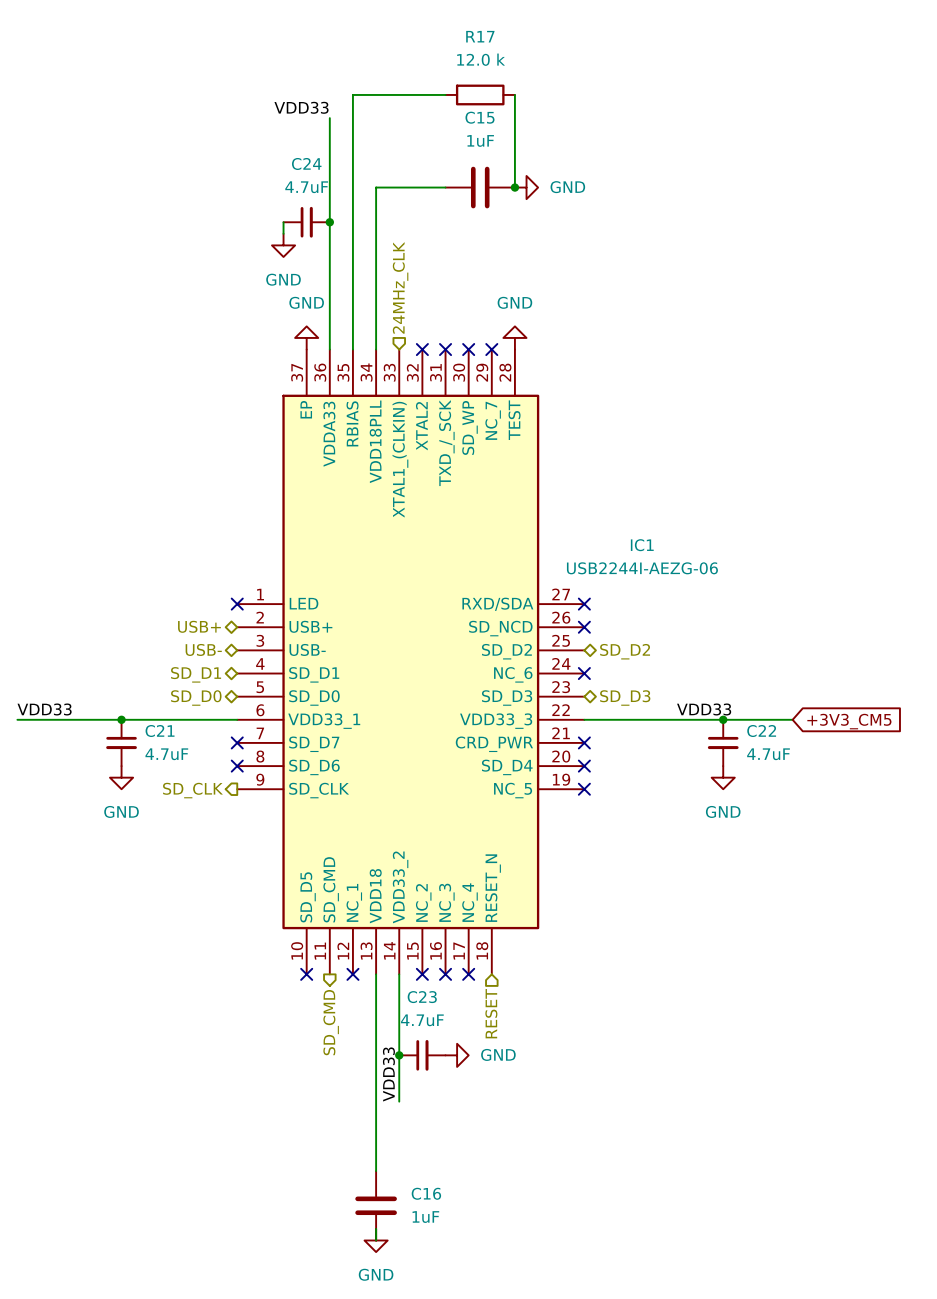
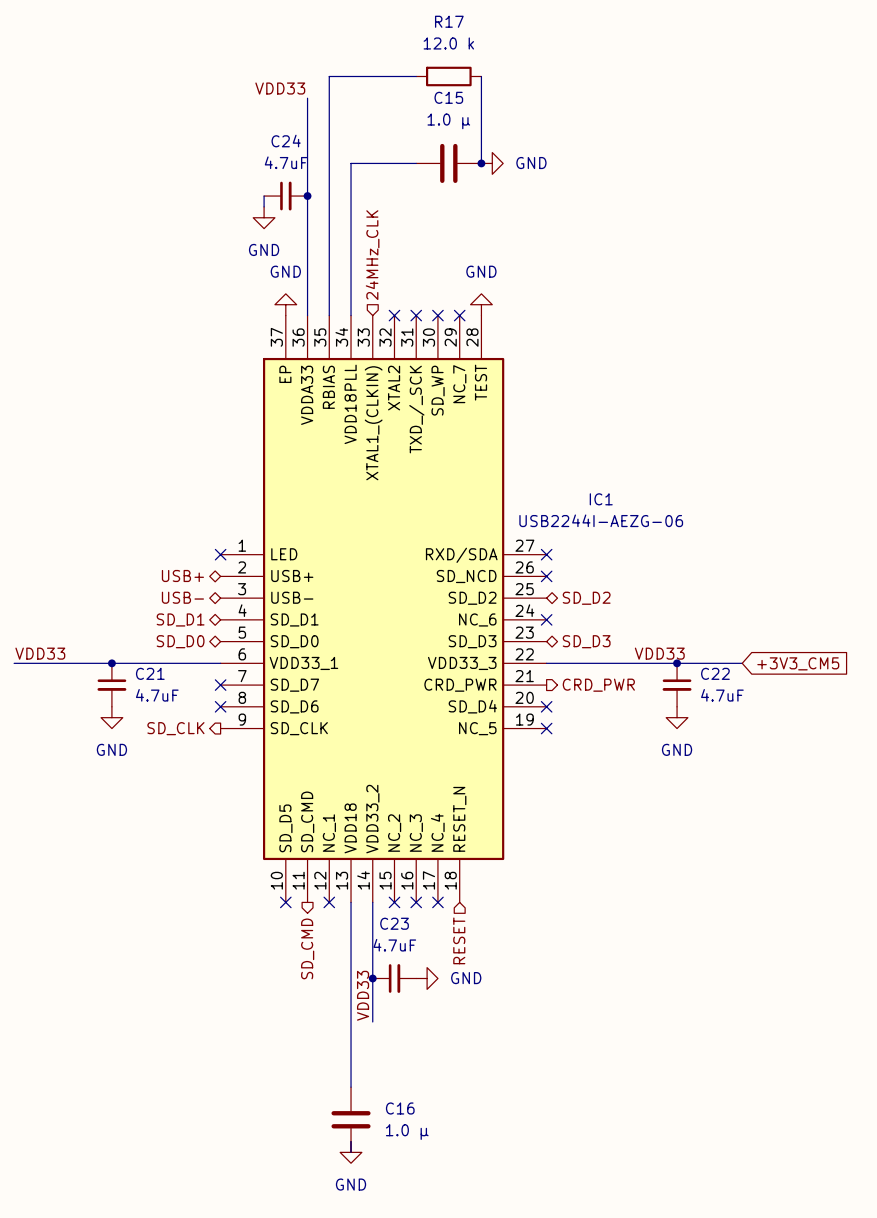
C15 value: 1uF (480, 140) -> 1.0 µ (448, 121)
no-connect mark: (584, 742) -> none
hierarchical label: none -> CRD_PWR (598, 685)
C16 value: 1uF (425, 1217) -> 1.0 µ (407, 1132)

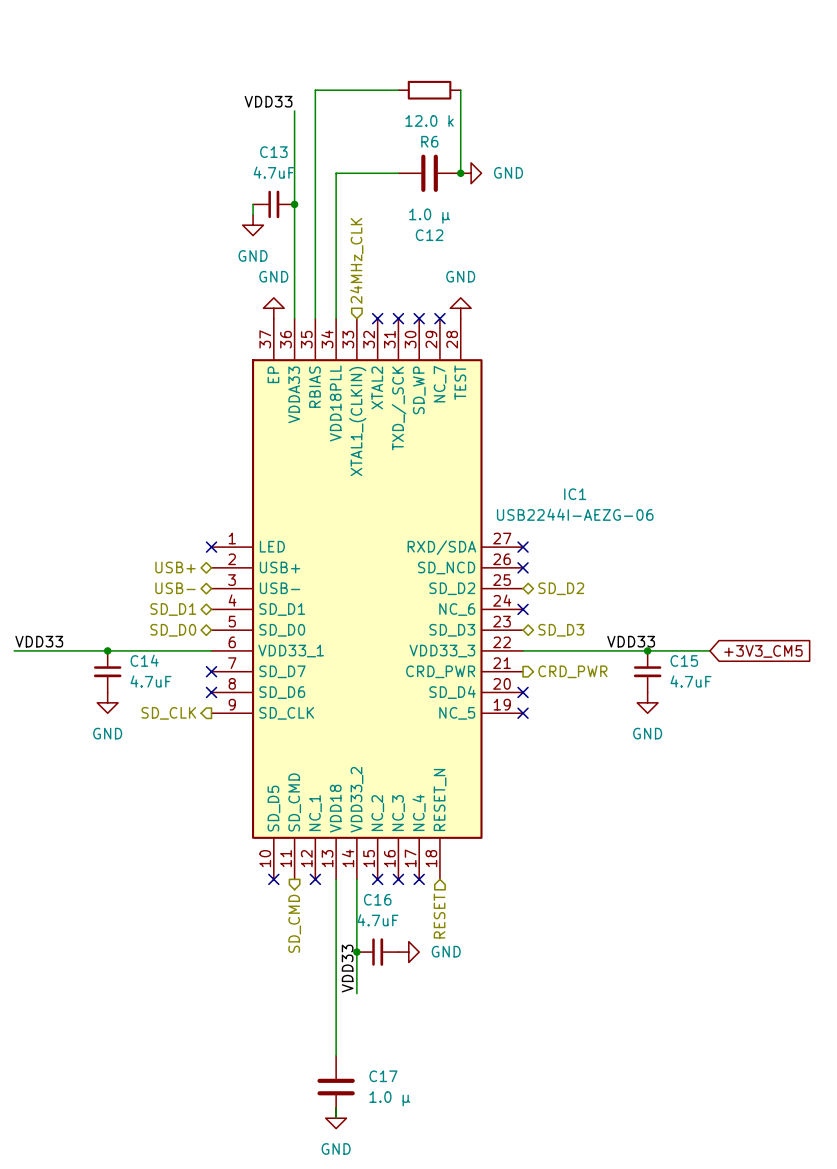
R17 name: R17 (449, 21) -> R6 (429, 141)
R17 value position: 12.0 k (448, 43) -> 12.0 k (429, 120)
C15 name: C15 (448, 97) -> C12 (429, 235)
C15 value position: 1.0 µ (448, 121) -> 1.0 µ (429, 216)
C24 name: C24 (286, 141) -> C13 (273, 152)
C21 name: C21 (150, 673) -> C14 (144, 660)
C22 name: C22 (715, 673) -> C15 (684, 660)
C23 name: C23 (394, 923) -> C16 (377, 899)
C16 name: C16 (400, 1108) -> C17 (383, 1076)

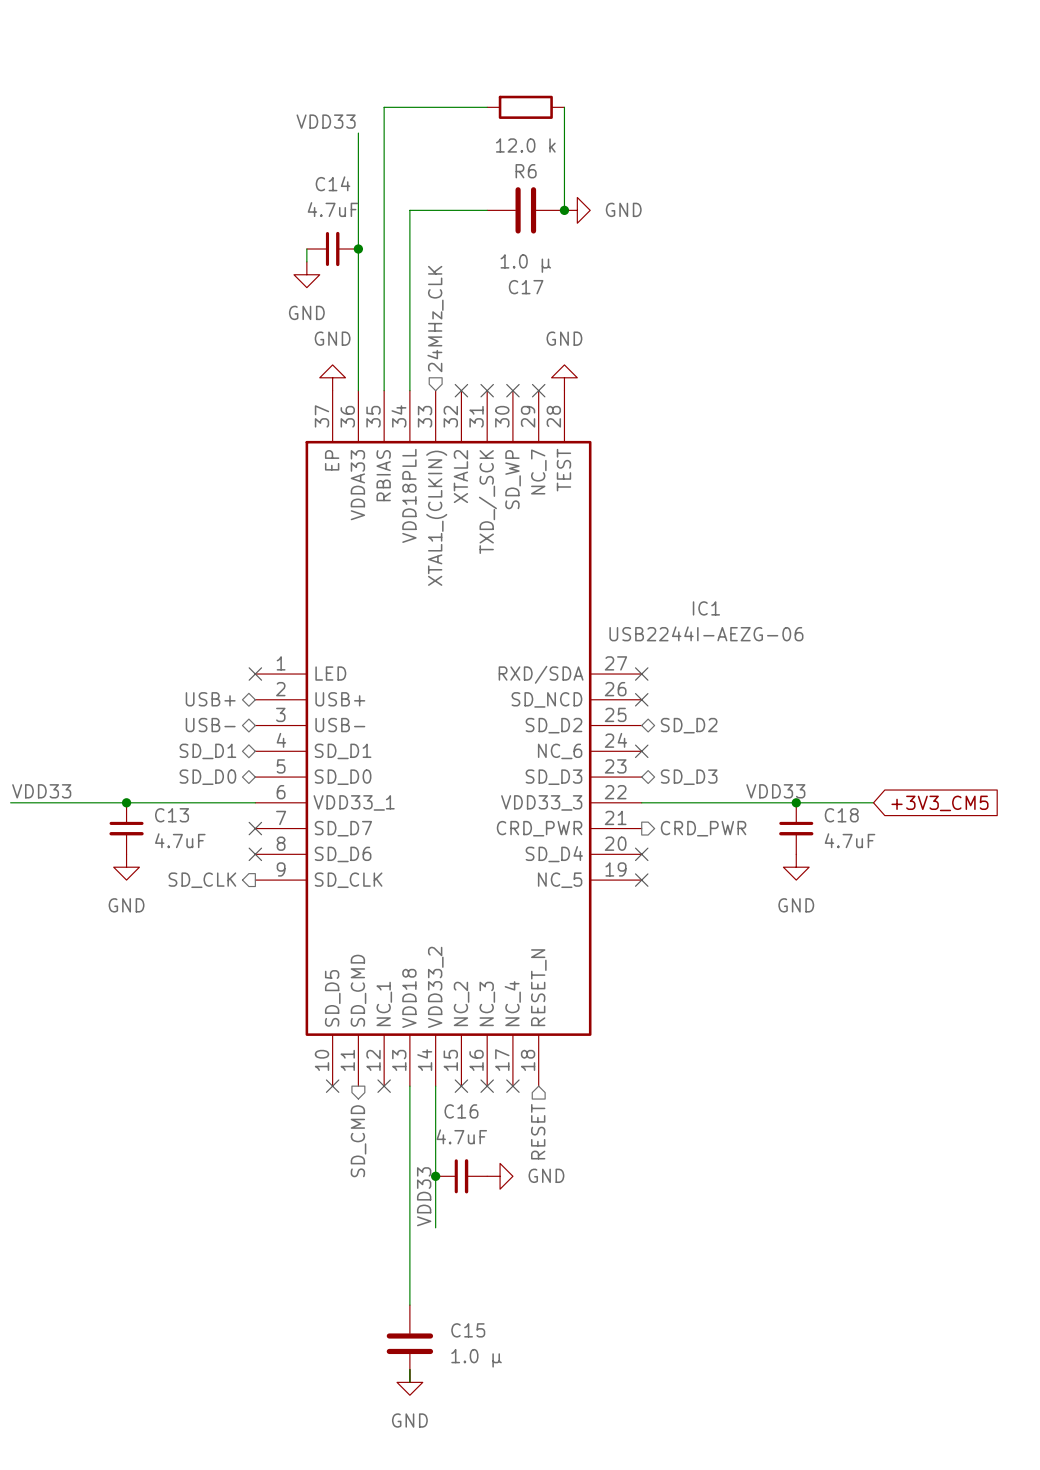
C13 name: C13 (273, 152) -> C14 (332, 183)
C12 name: C12 (429, 235) -> C17 (526, 287)
C14 name: C14 (144, 660) -> C13 (172, 815)
C15 name: C15 (684, 660) -> C18 (841, 815)
C17 name: C17 (383, 1076) -> C15 (468, 1330)

